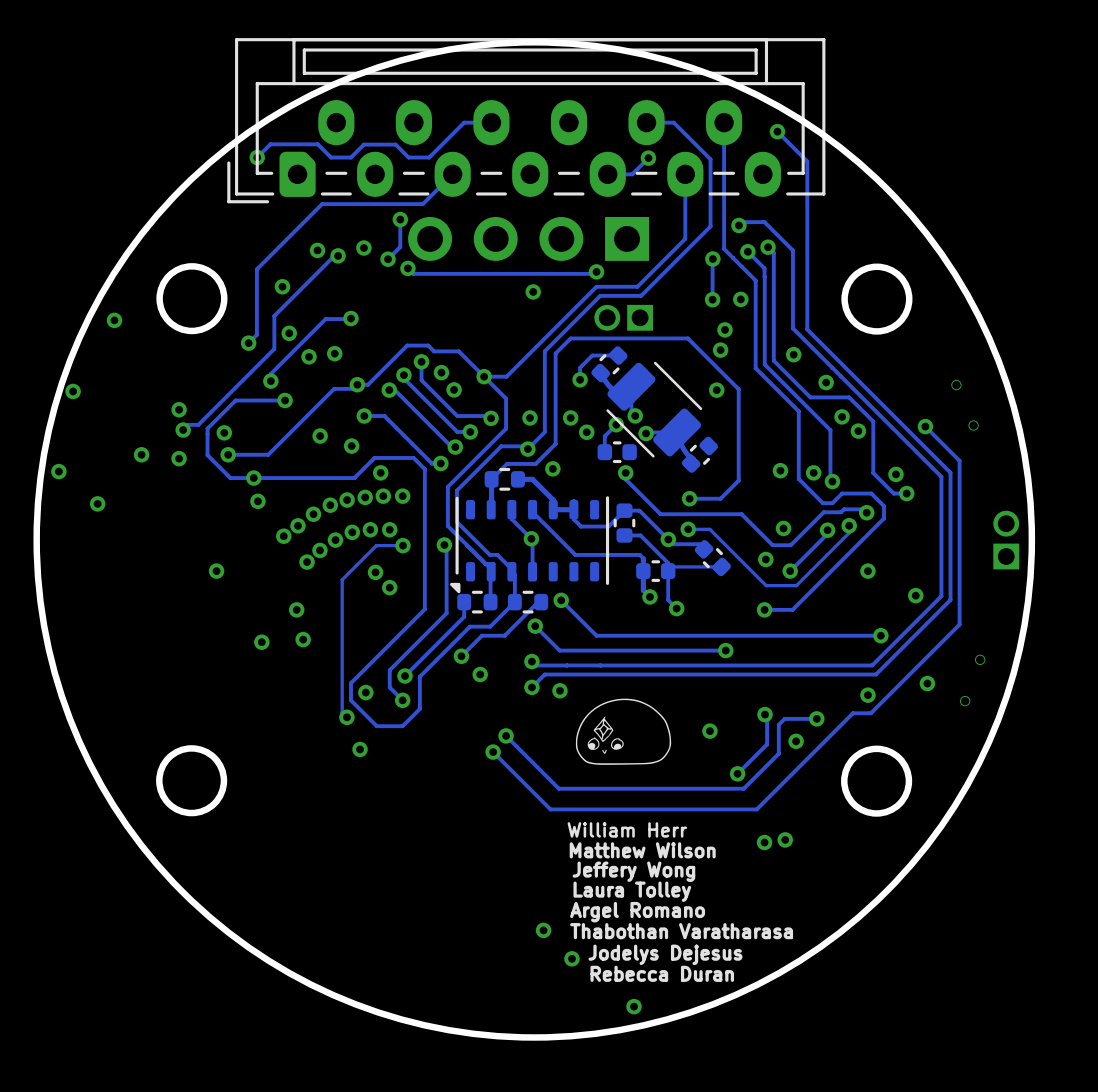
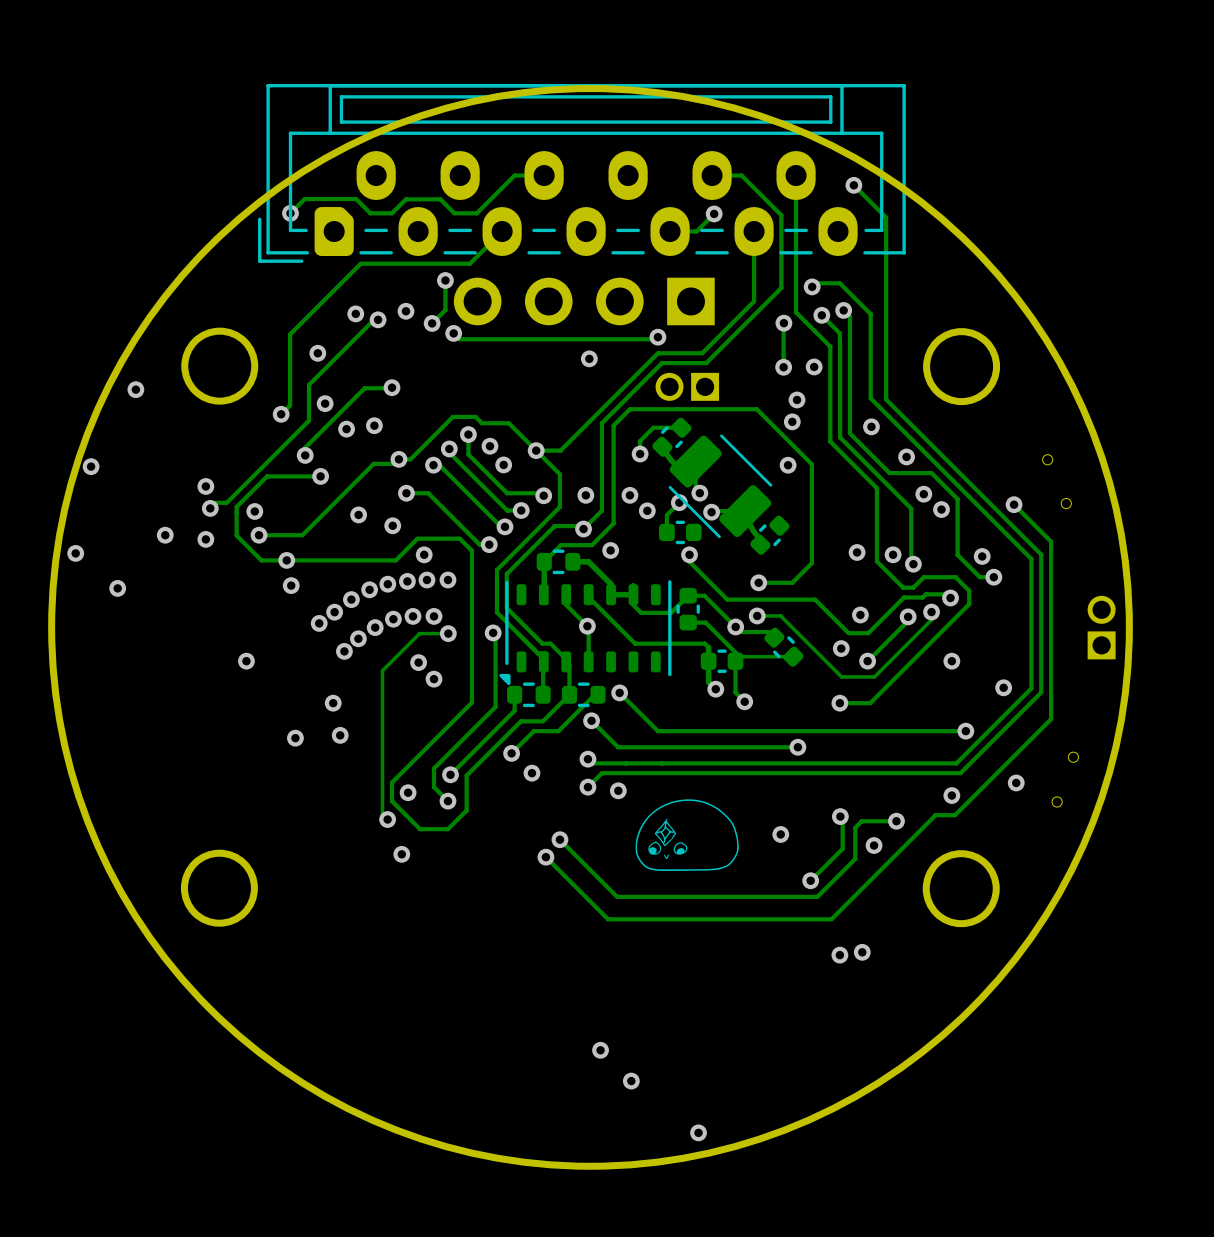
text: William Herr (627, 829) -> none
text: Matthew Wilson (642, 850) -> none
text: Jeffery Wong (633, 871) -> none
text: Laura Tolley (632, 891) -> none
text: Argel Romano (637, 912) -> none
text: Thabothan Varatharasa (681, 931) -> none
text: Jodelys Dejesus (665, 954) -> none
text: Rebecca Duran (662, 973) -> none

